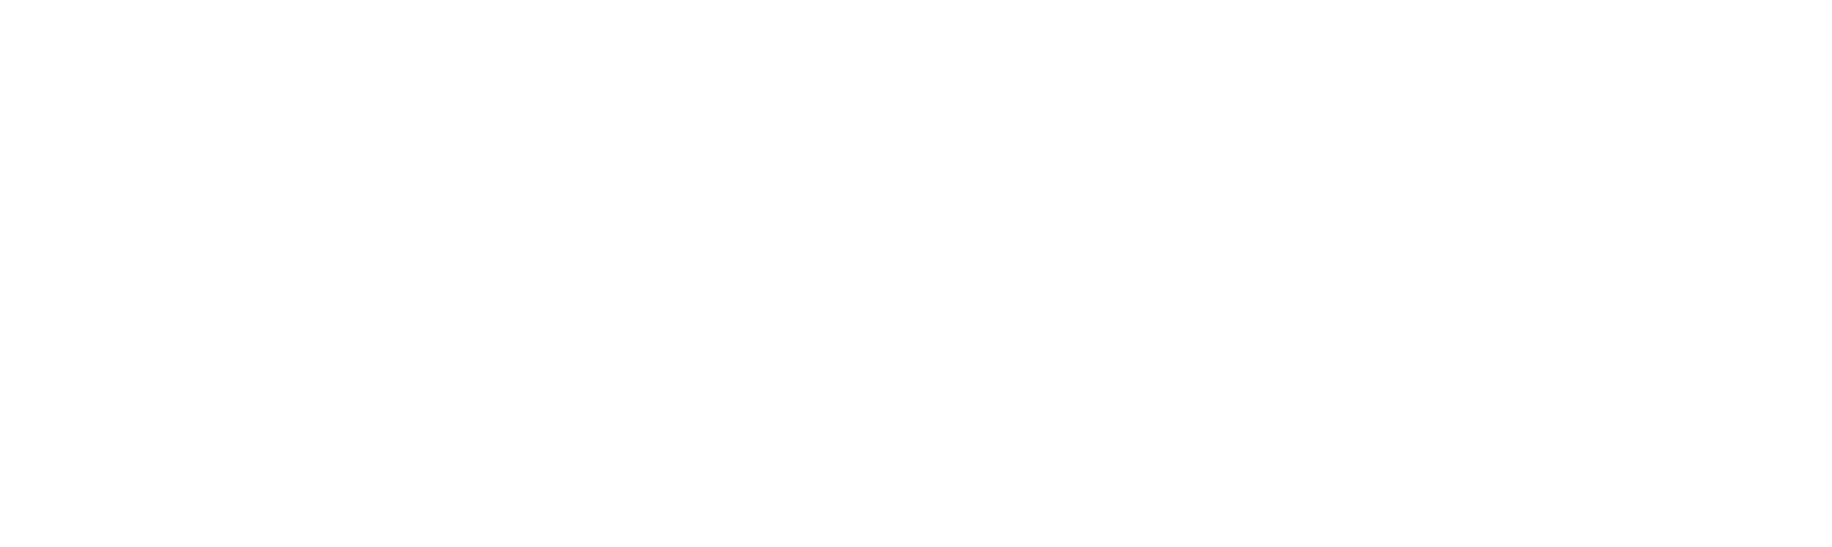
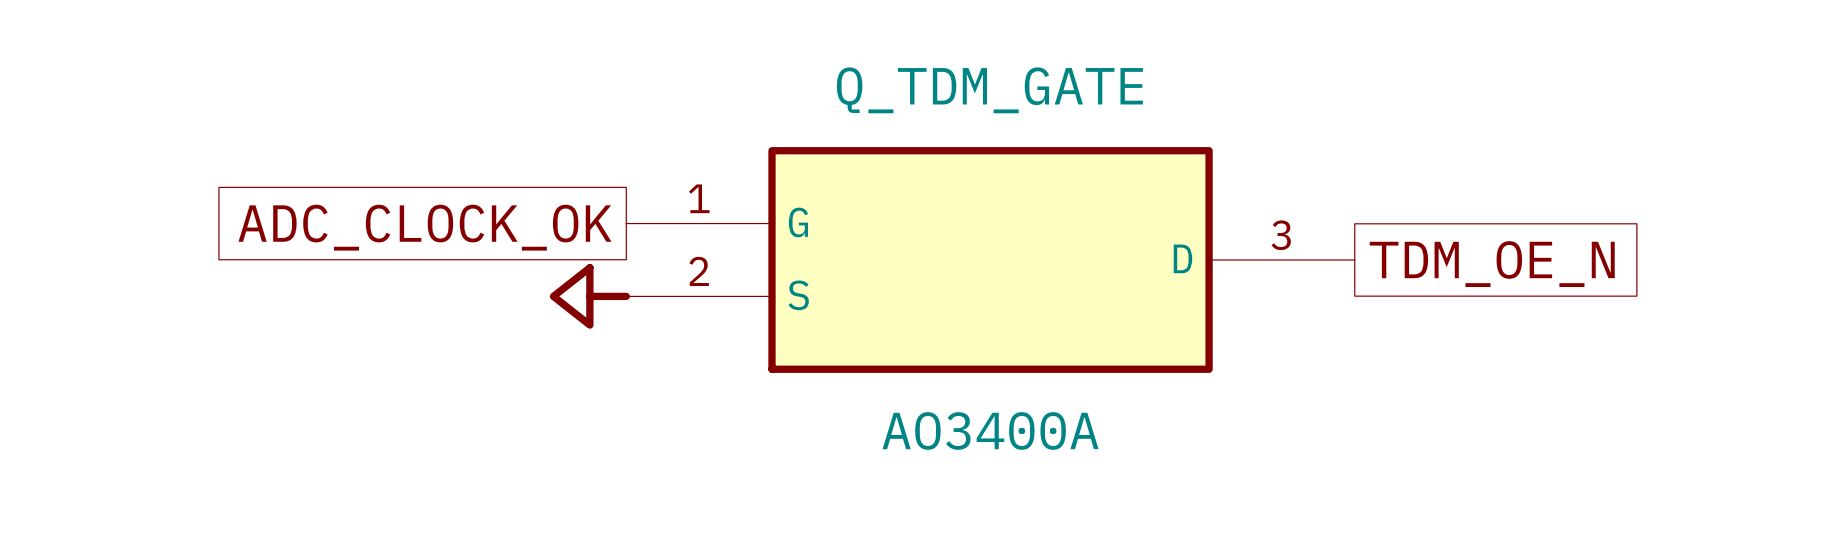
global label: none -> ADC_CLOCK_OK (425, 227)
Q_TDM_GATE: none -> AO3400A (990, 259)
global label: none -> TDM_OE_N (1492, 264)
power symbol: none -> (589, 296)

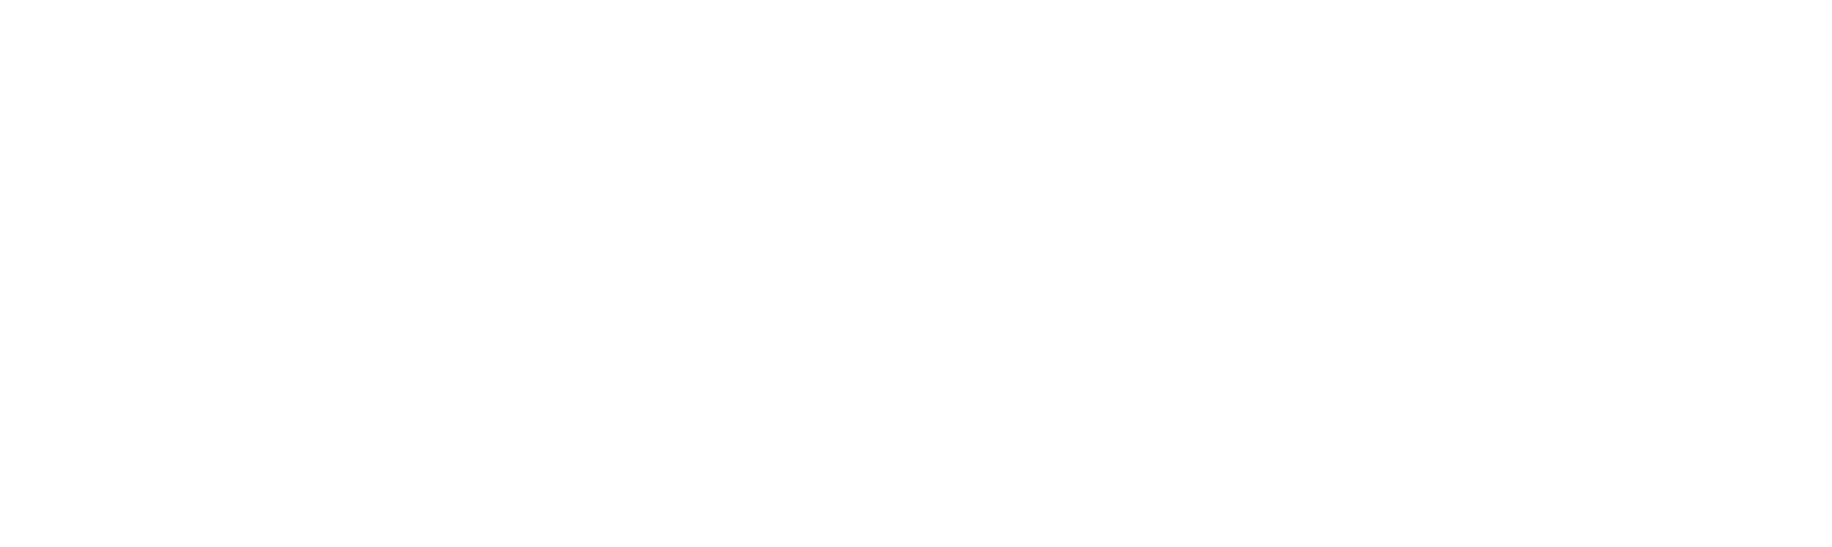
global label: ADC_CLOCK_OK (425, 227) -> none
Q_TDM_GATE: AO3400A (990, 259) -> none
global label: TDM_OE_N (1492, 264) -> none
power symbol: (589, 296) -> none

